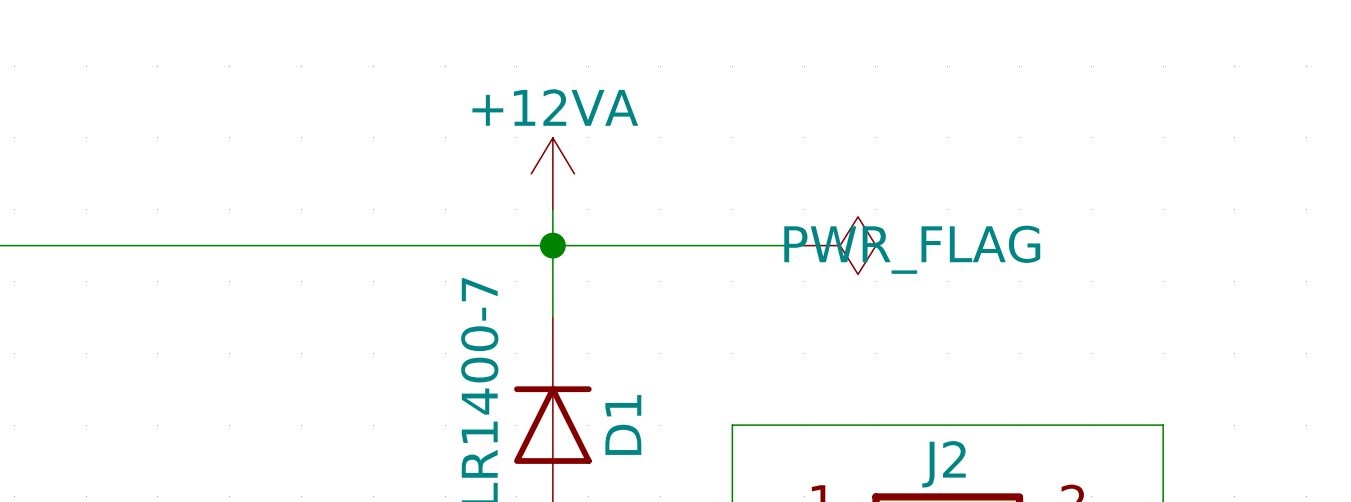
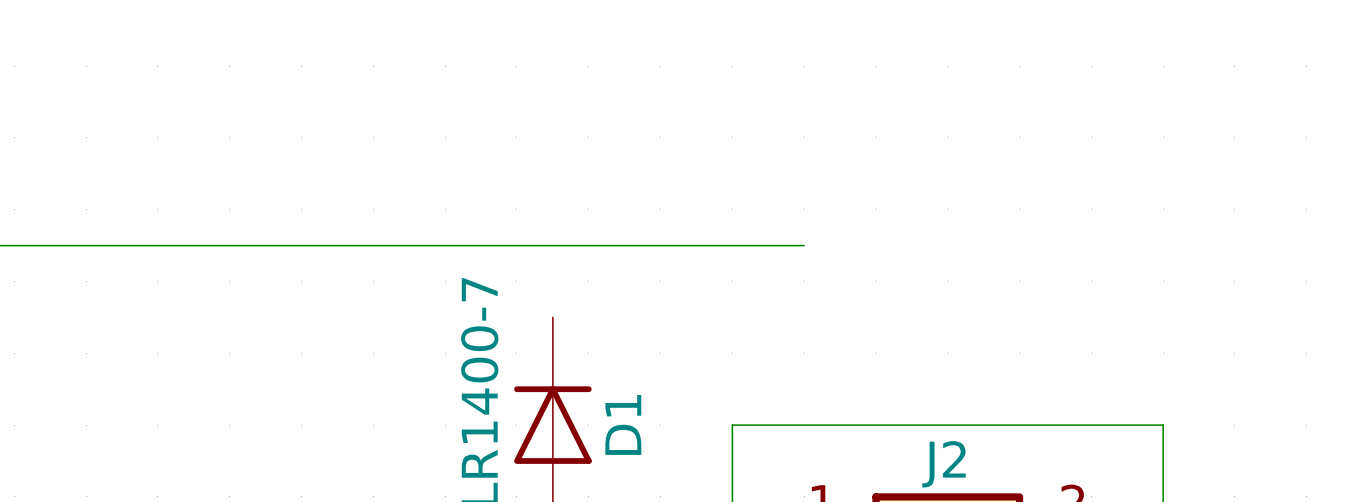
power symbol: +12VA (552, 173) -> none
wire: (552, 209) (552, 317) -> none
junction: (552, 245) -> none
power symbol: PWR_FLAG (840, 245) -> none

